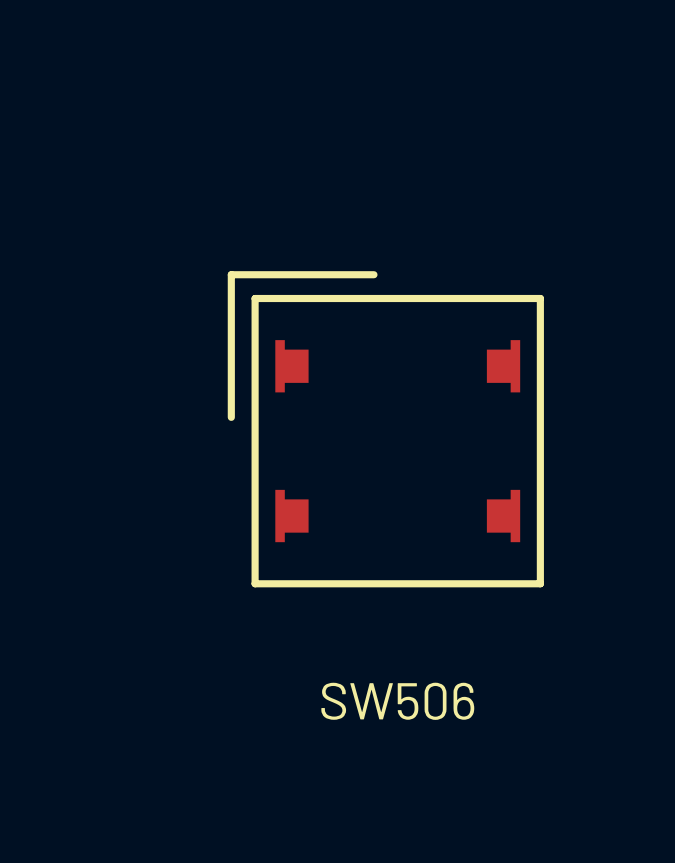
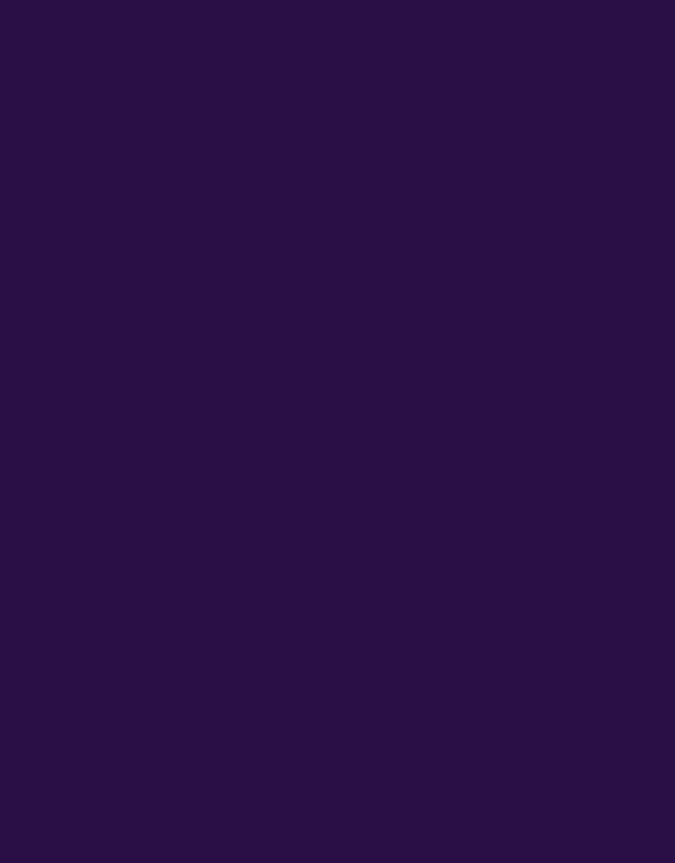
SW506: (385, 429) -> none

